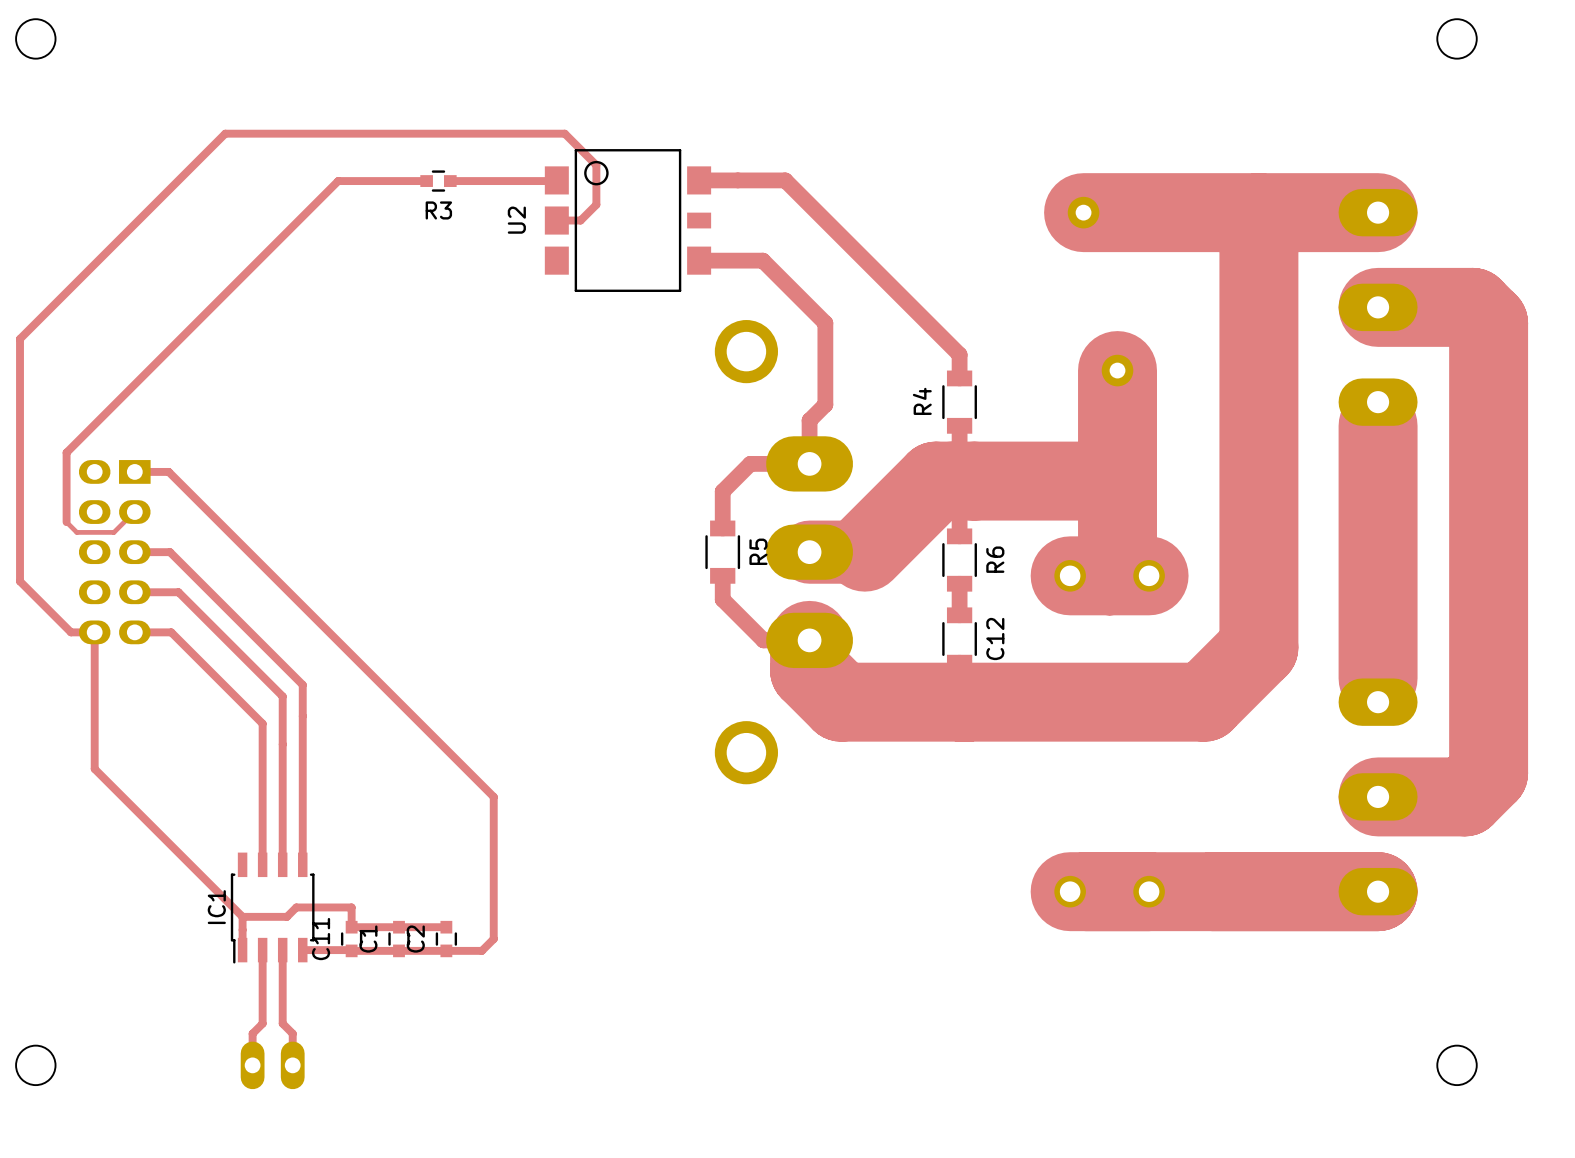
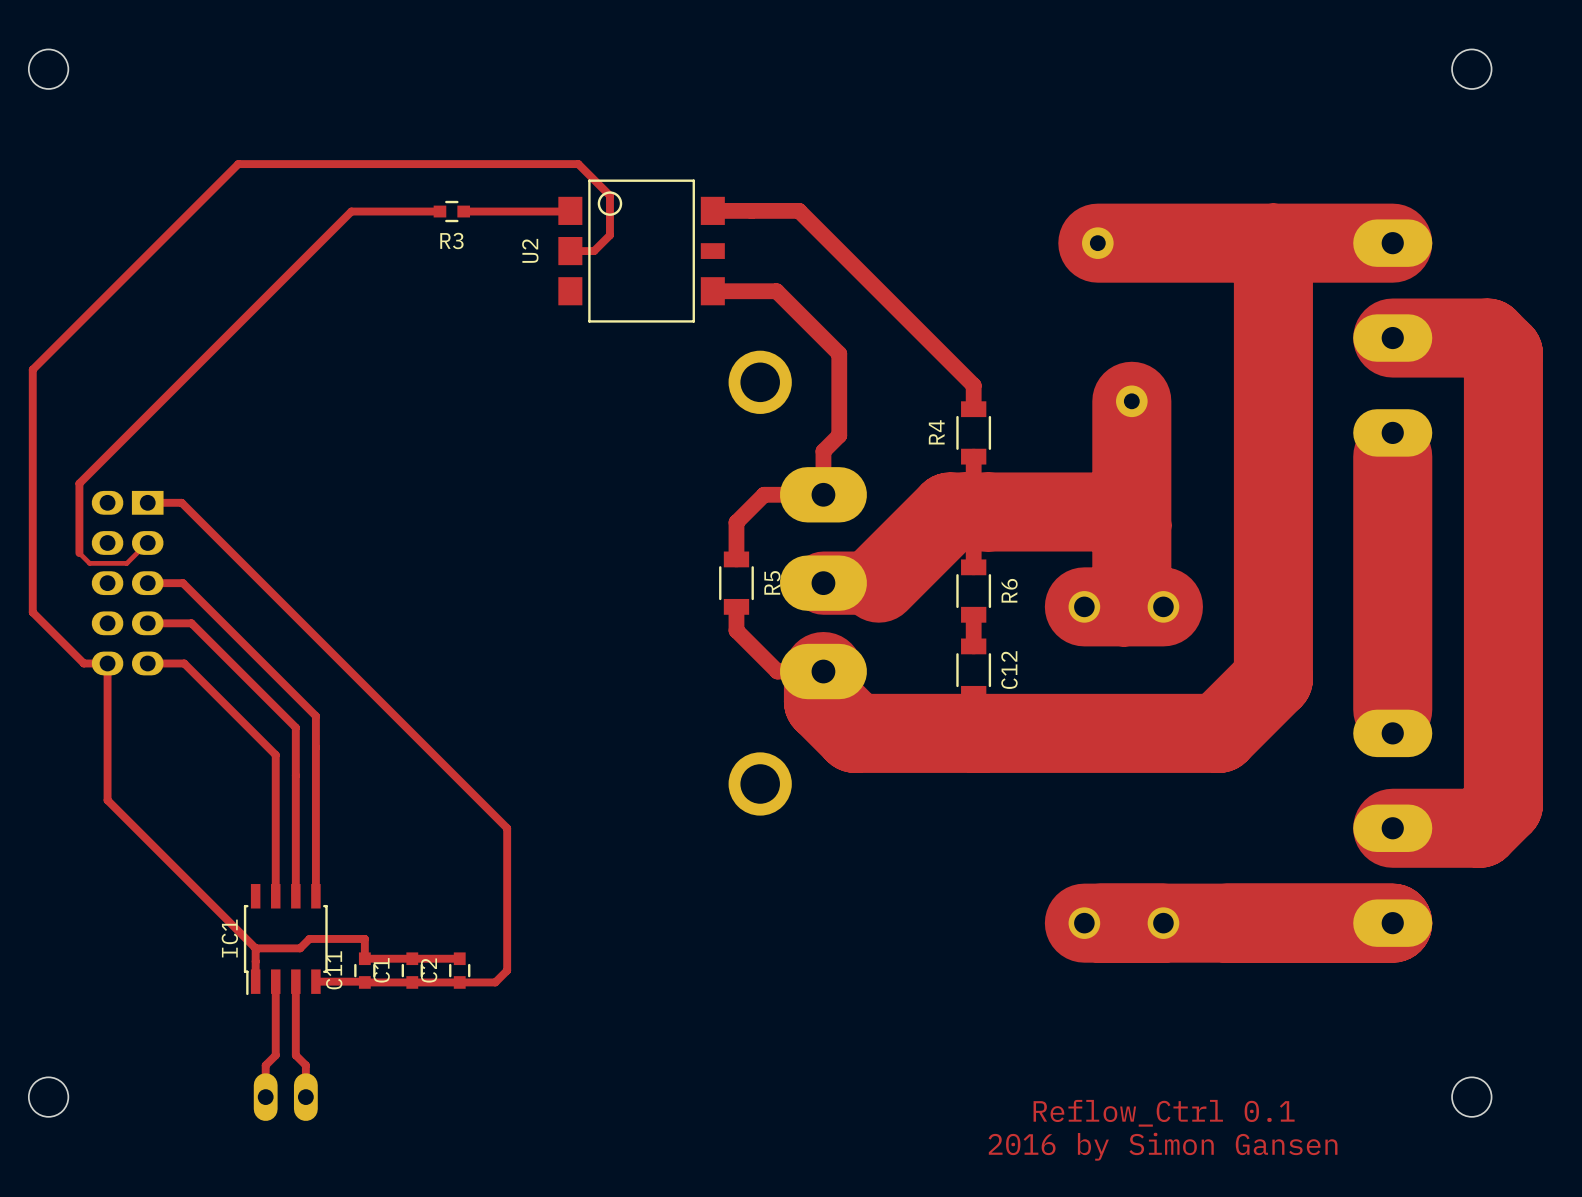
text: none -> Reflow_Ctrl 0.1 (1164, 1113)
text: none -> 2016 by Simon Gansen (1163, 1146)

